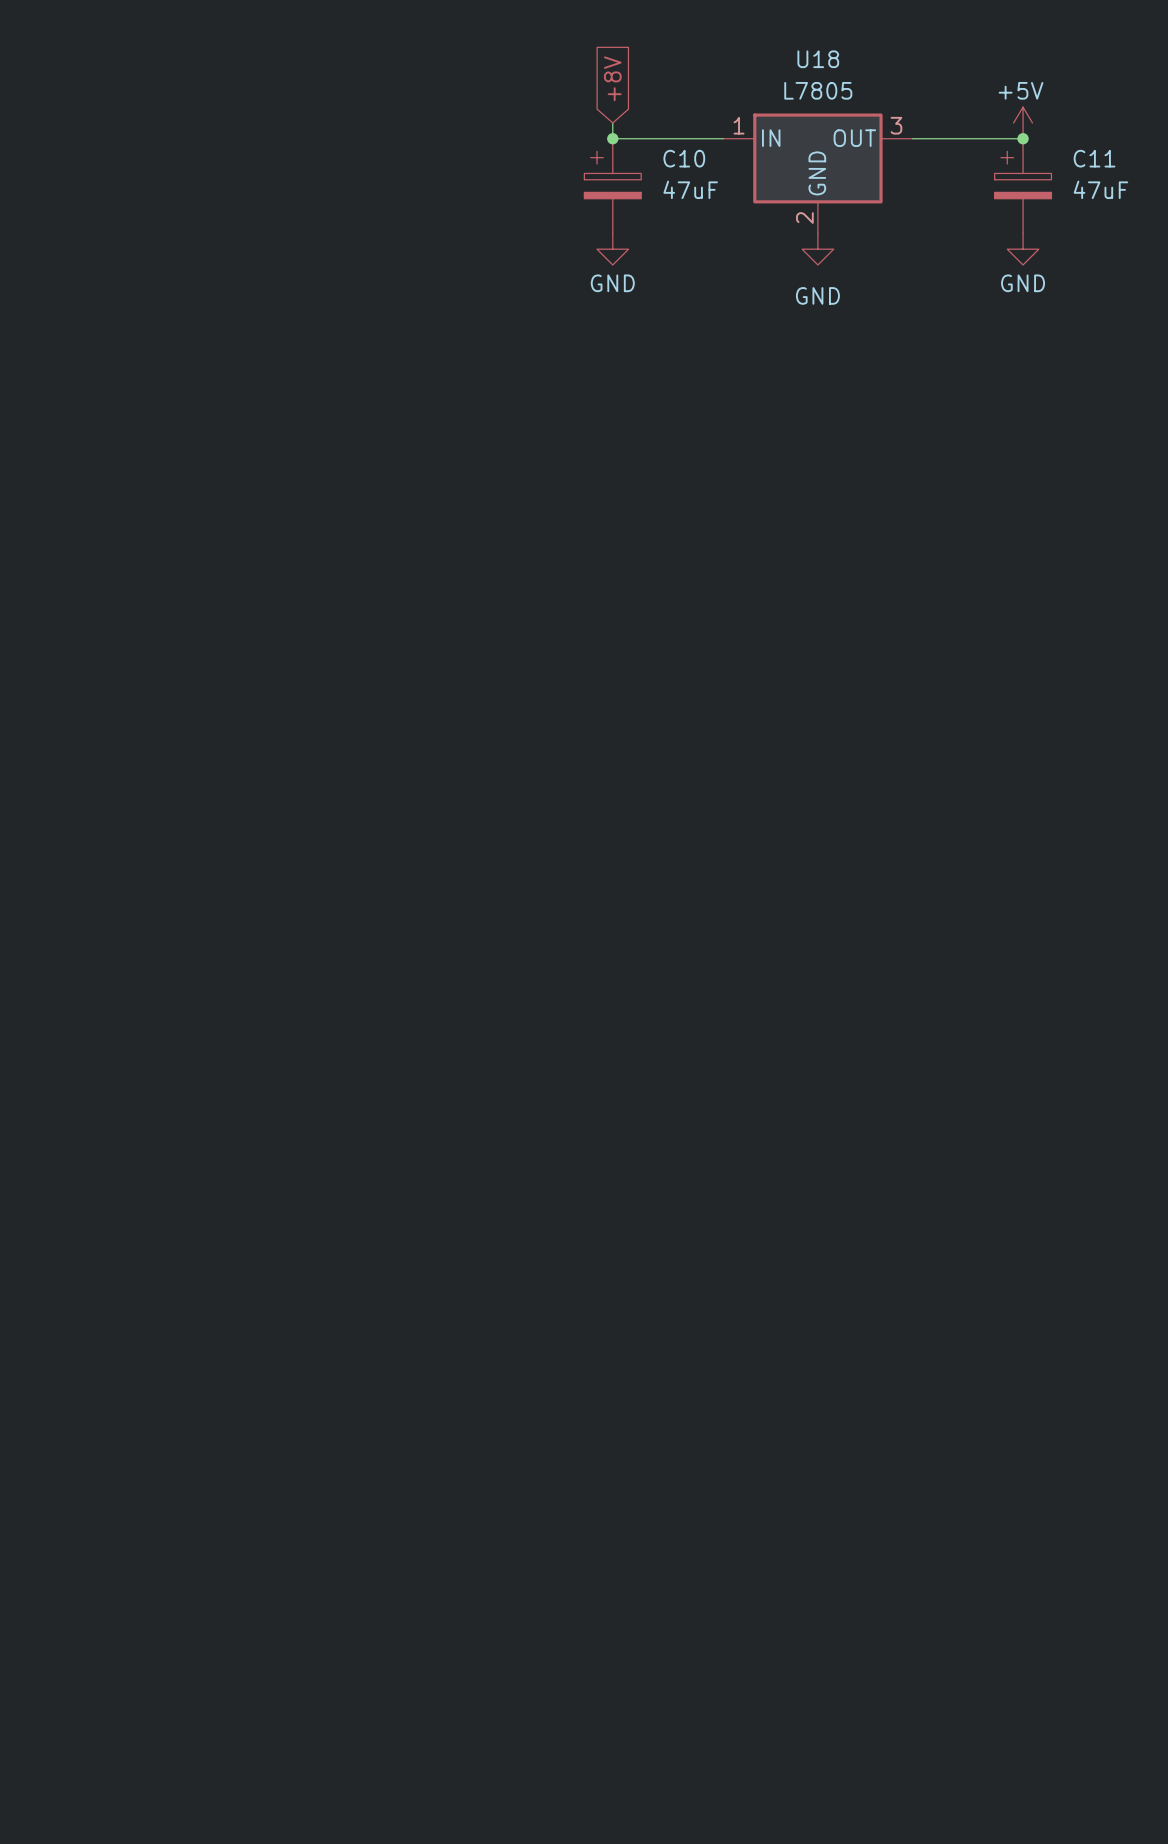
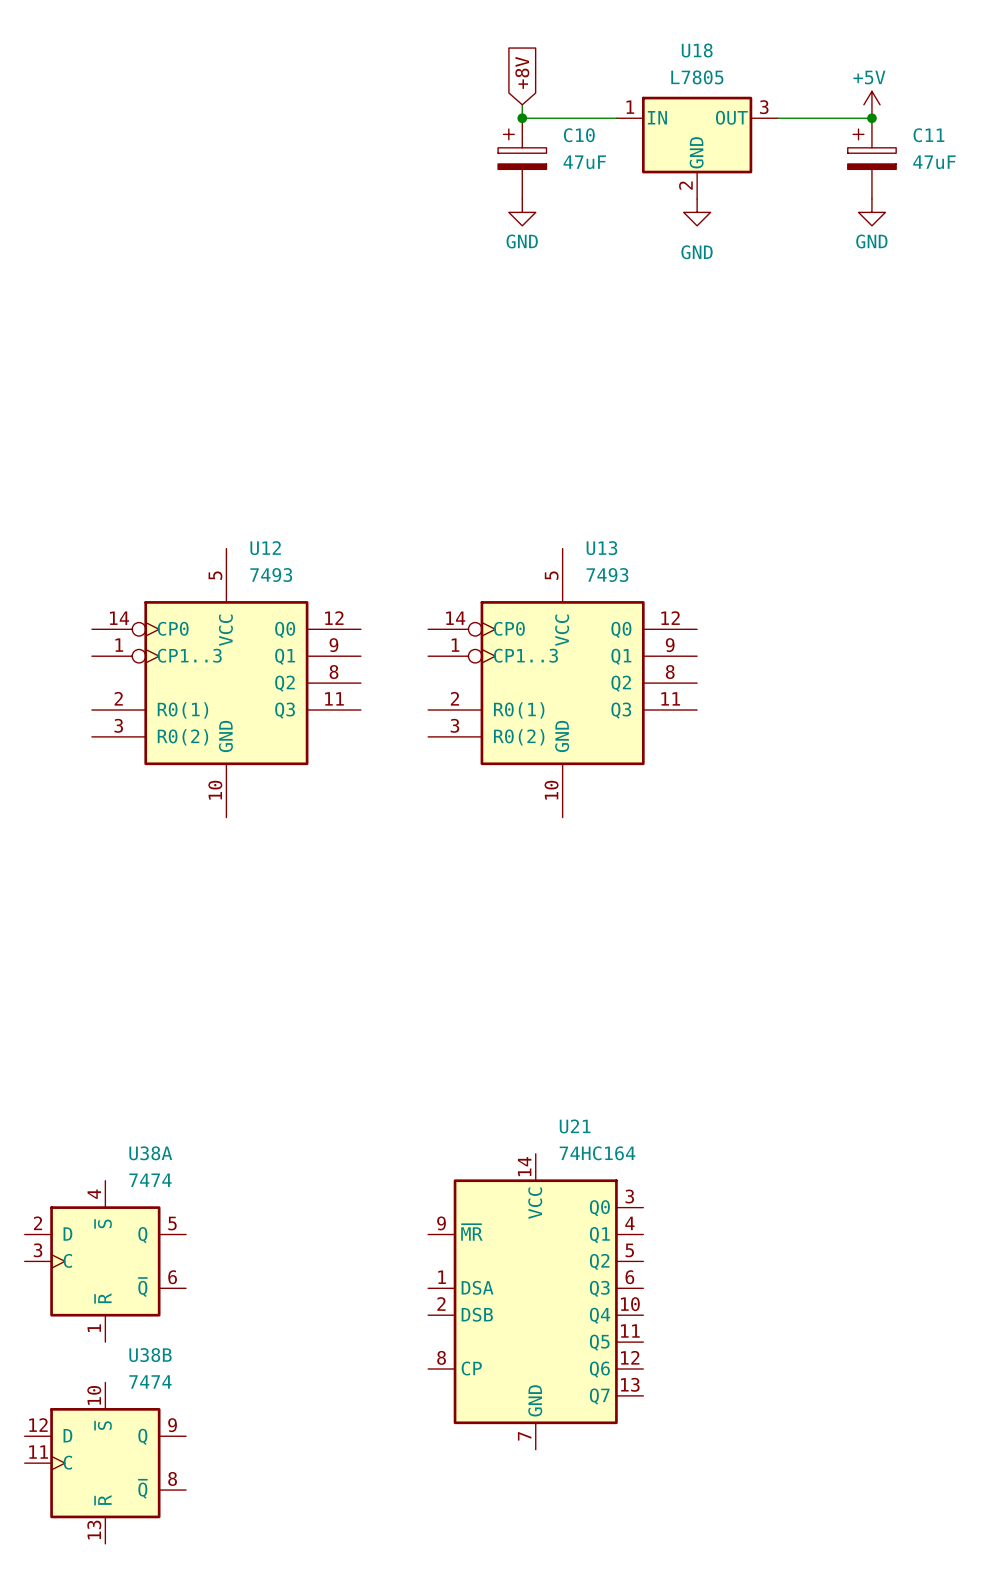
U12: none -> 7493 (226, 683)
U13: none -> 7493 (562, 683)
U38A: none -> 7474 (105, 1261)
U21: none -> 74HC164 (535, 1301)
U38B: none -> 7474 (105, 1463)

